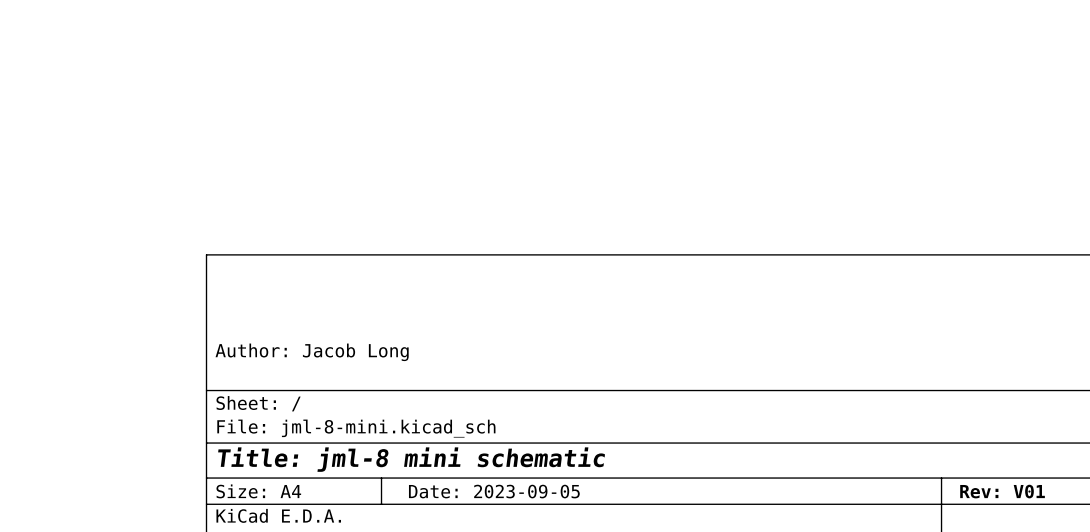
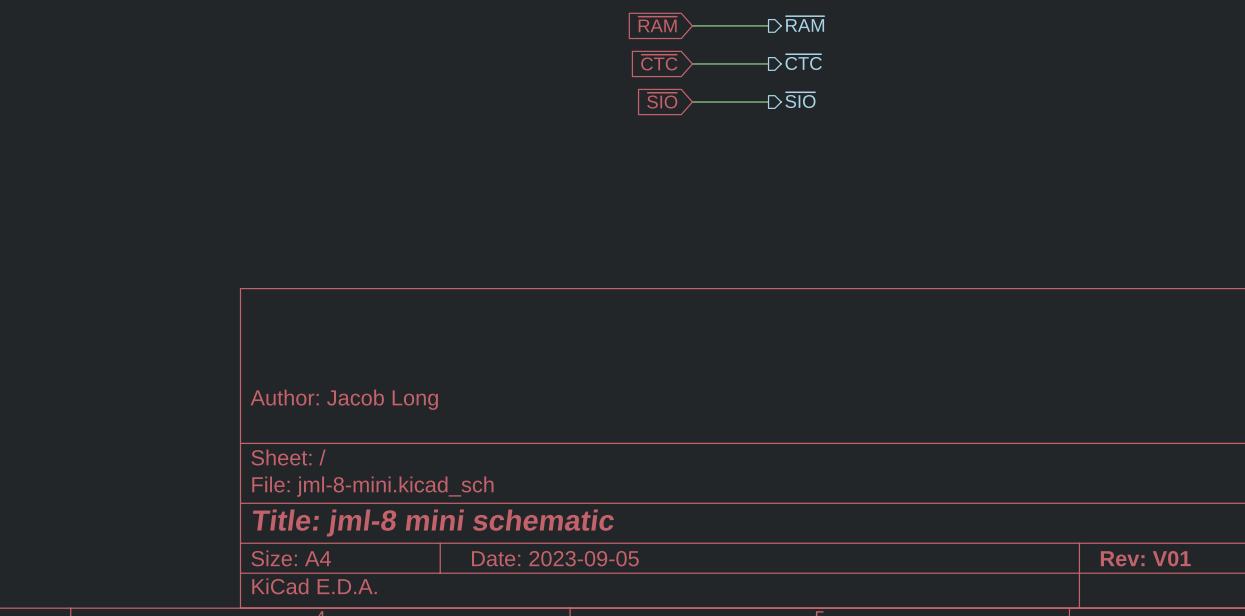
global label: none -> ~{RAM} (657, 24)
sheet pin: none -> ~{RAM} (805, 23)
wire: none -> (692, 25) (768, 25)
global label: none -> ~{CTC} (659, 62)
sheet pin: none -> ~{CTC} (803, 62)
wire: none -> (692, 63) (768, 63)
sheet pin: none -> ~{SIO} (800, 100)
global label: none -> ~{SIO} (662, 100)
wire: none -> (692, 102) (768, 102)

